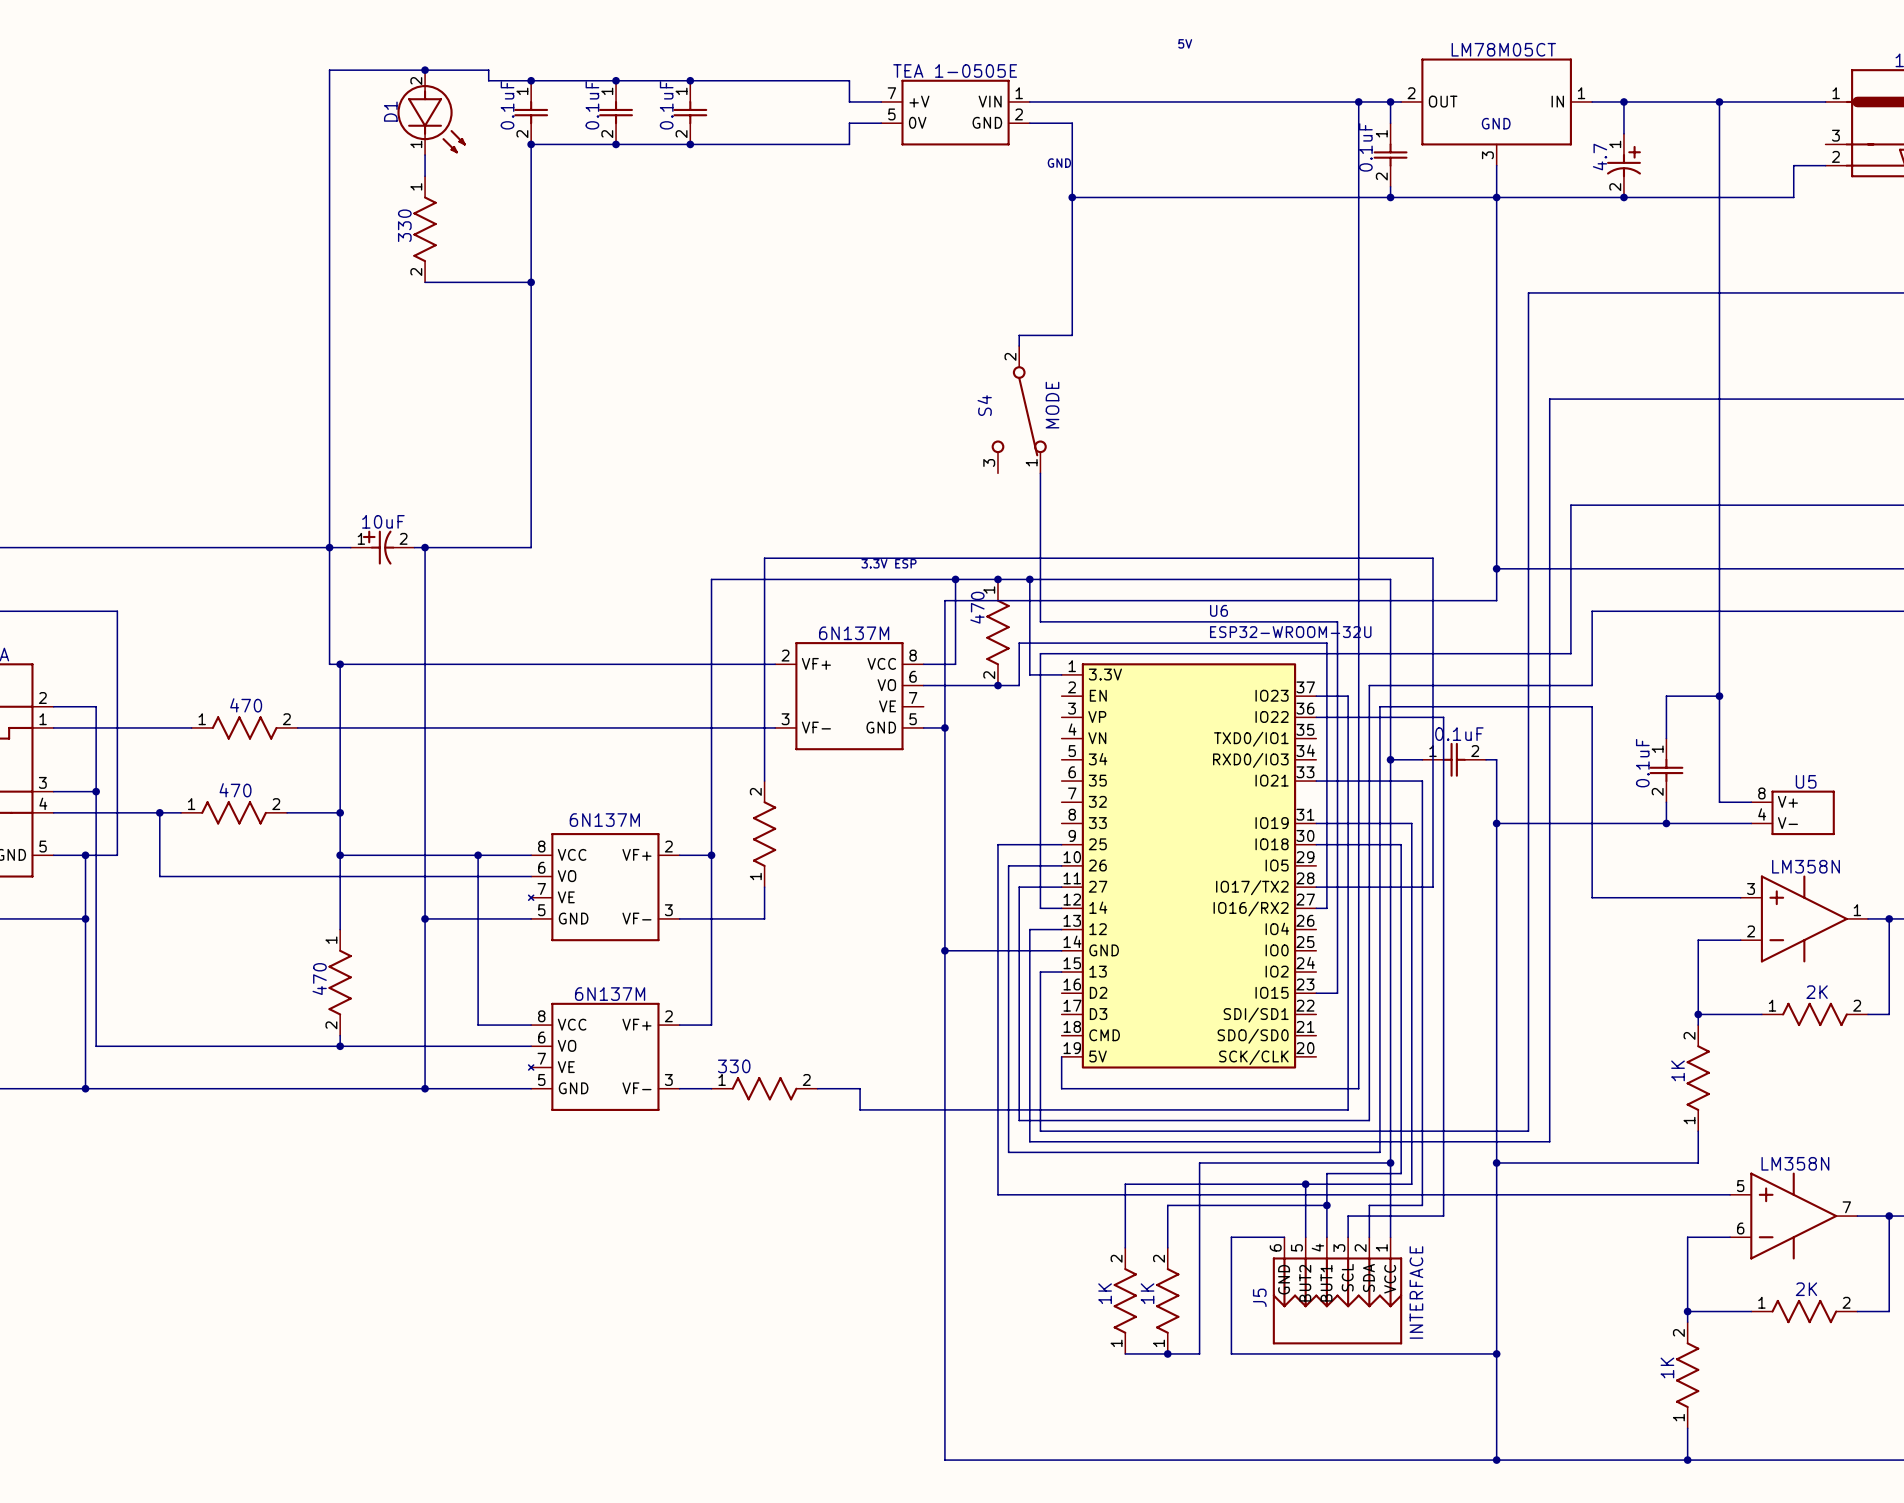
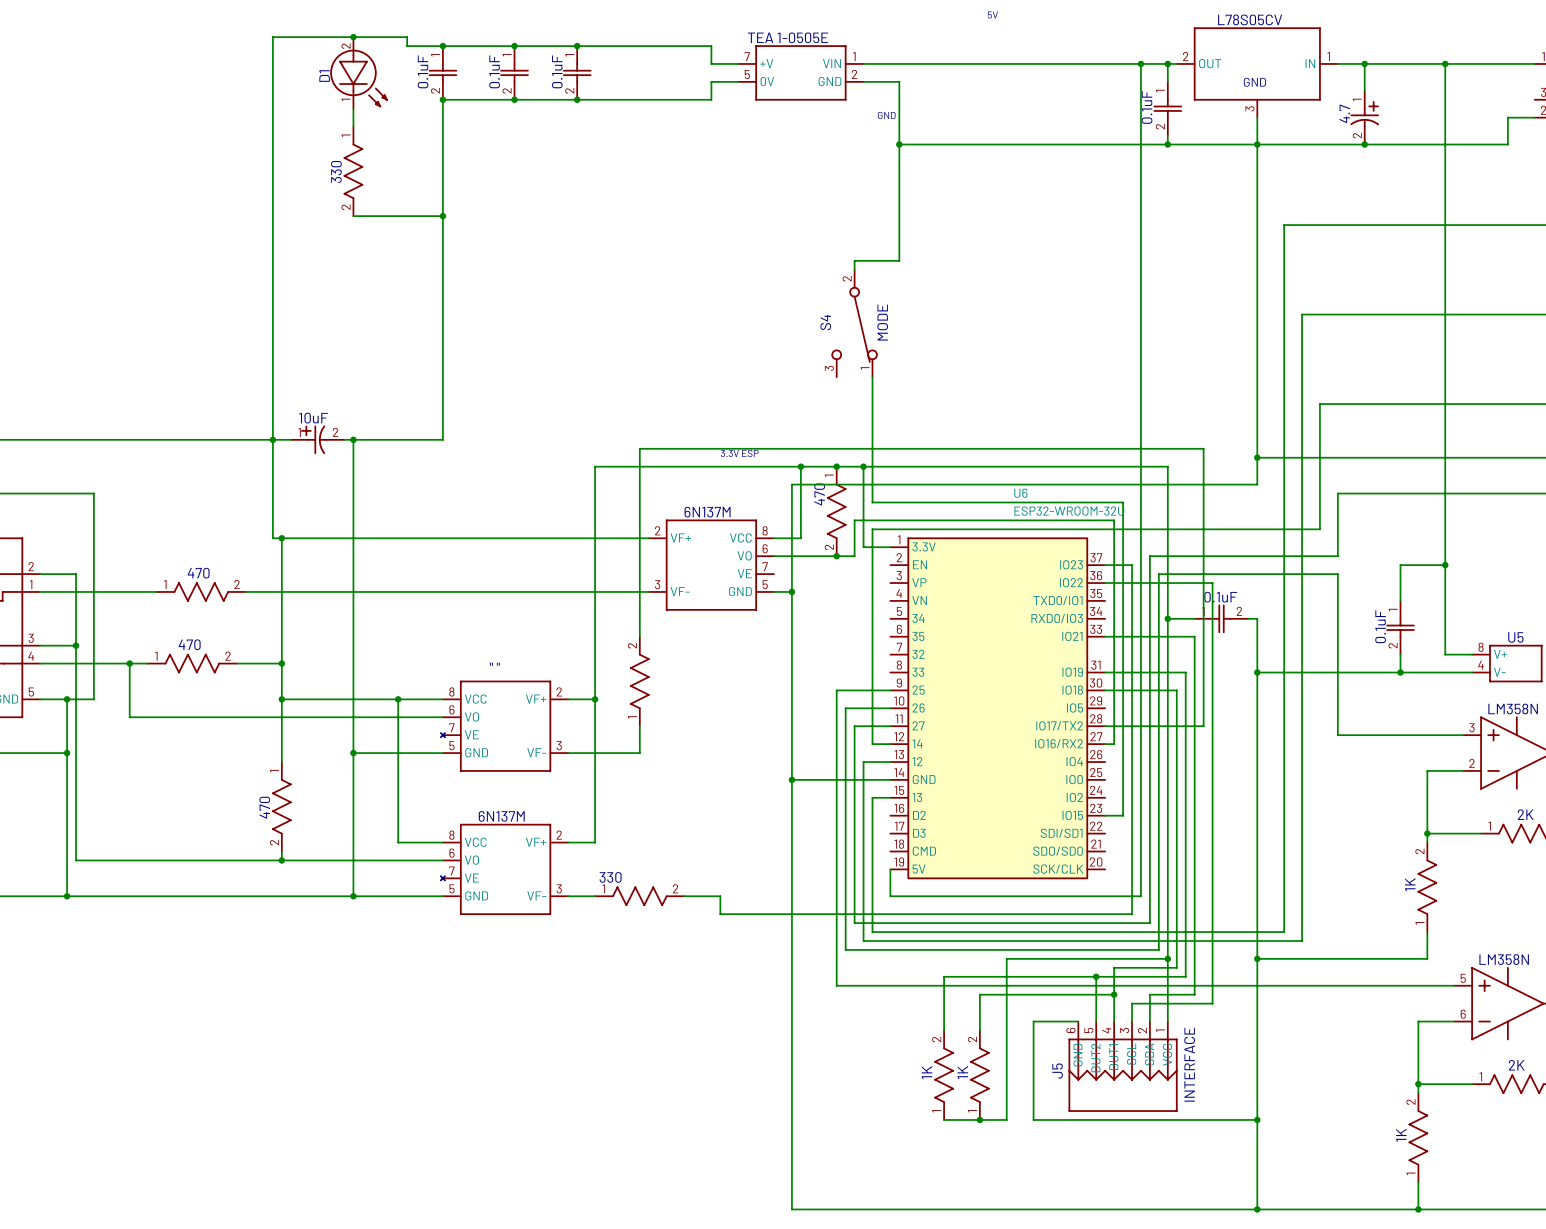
text: LM78M05CT (1503, 49) -> L78S05CV (1250, 19)
text: none -> " " (494, 664)
text: 6N137M (604, 820) -> none

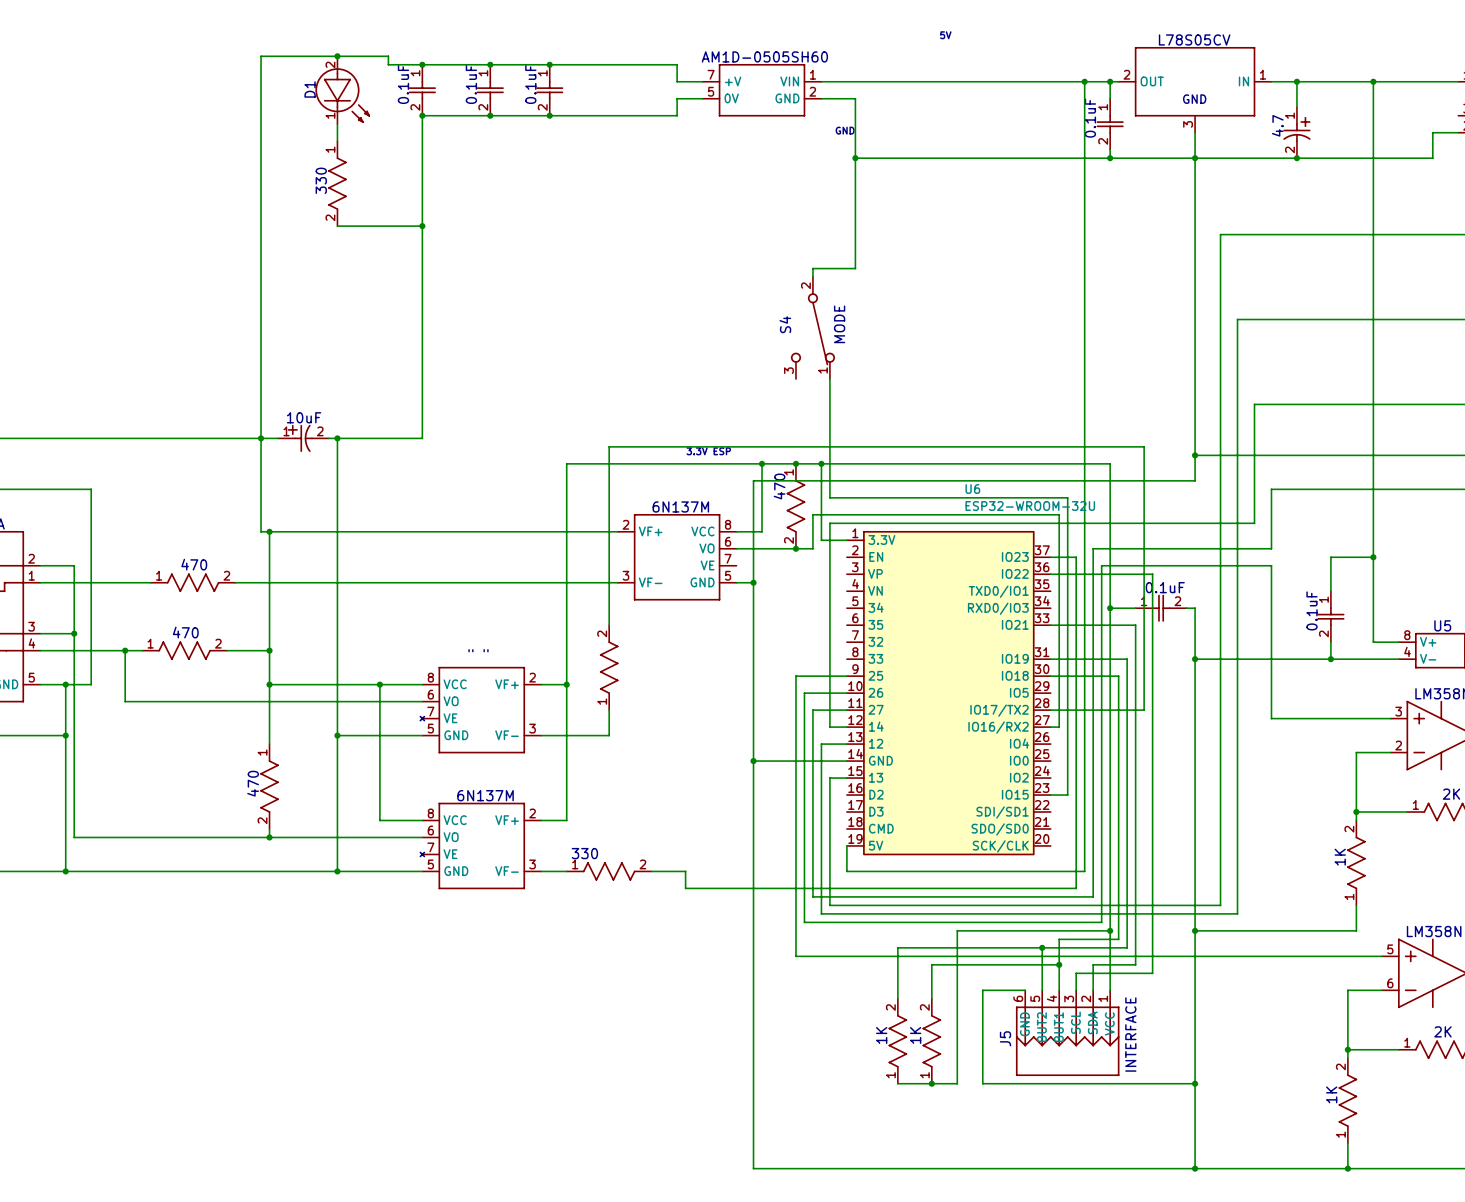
text: TEA 1-0505E (787, 37) -> none
text: none -> AM1D-0505SH60 (764, 56)

